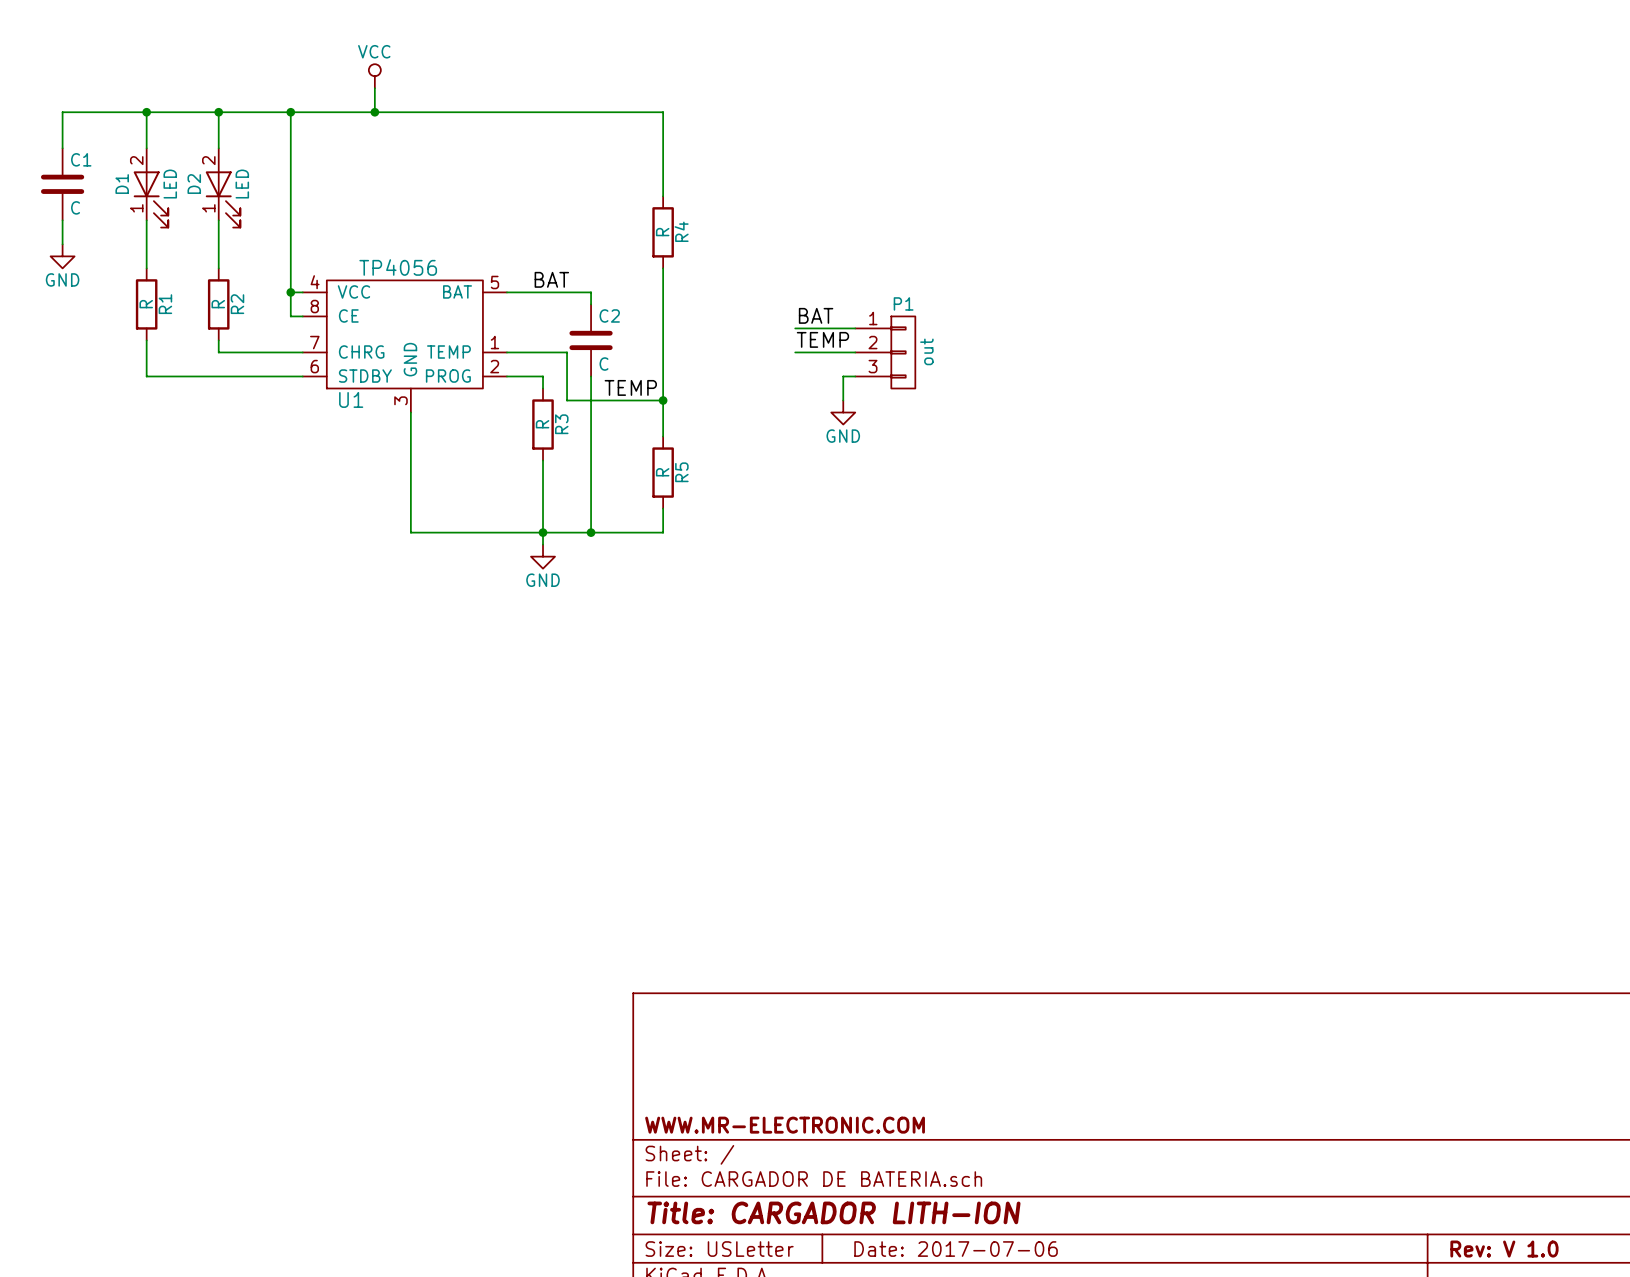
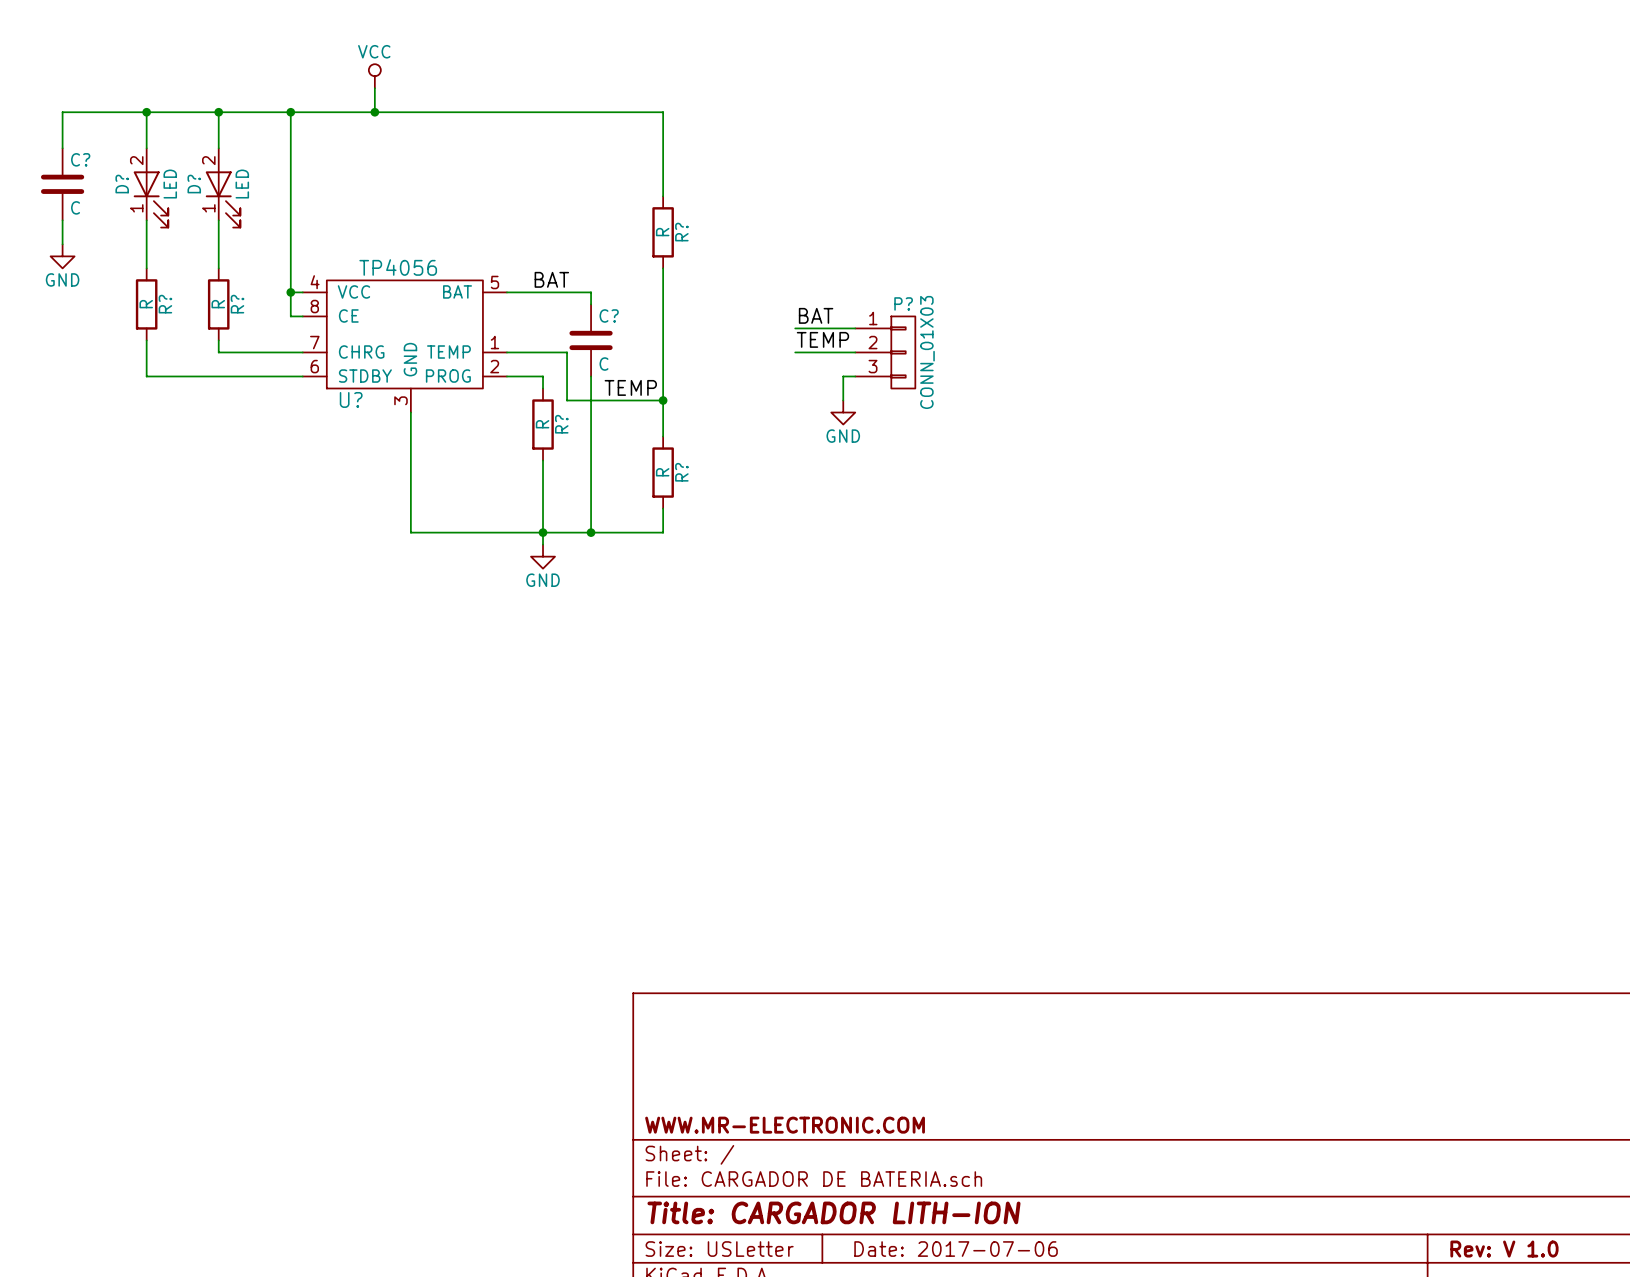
C1 name: C1 (81, 159) -> C? (80, 159)
D1 name: D1 (122, 184) -> D? (122, 184)
D2 name: D2 (194, 184) -> D? (194, 184)
R4 name: R4 (681, 231) -> R? (681, 232)
P1 name: P1 (903, 303) -> P? (903, 303)
R1 name: R1 (165, 304) -> R? (165, 304)
R2 name: R2 (237, 304) -> R? (237, 304)
C2 name: C2 (609, 315) -> C? (609, 315)
P1 value: out (926, 351) -> CONN_01X03 (927, 352)
U1 name: U1 (351, 399) -> U? (351, 399)
R3 name: R3 (561, 424) -> R? (561, 424)
R5 name: R5 (681, 472) -> R? (681, 472)

